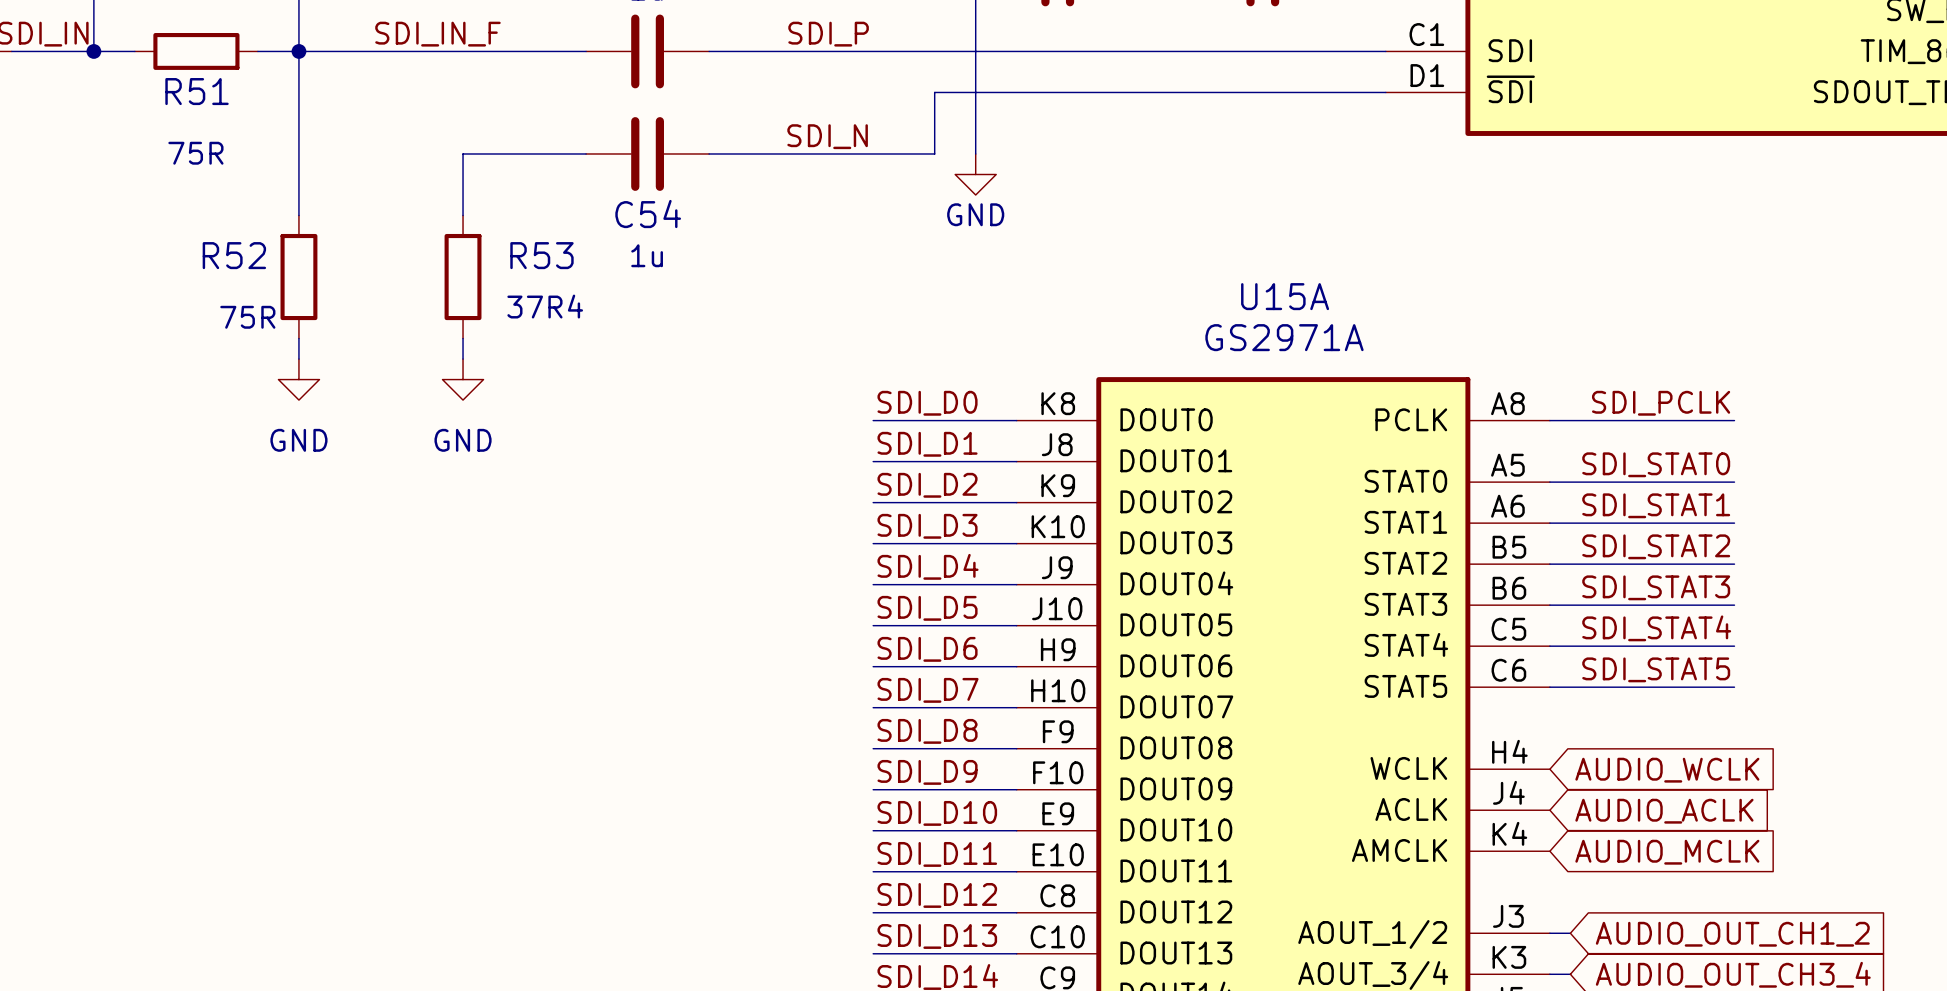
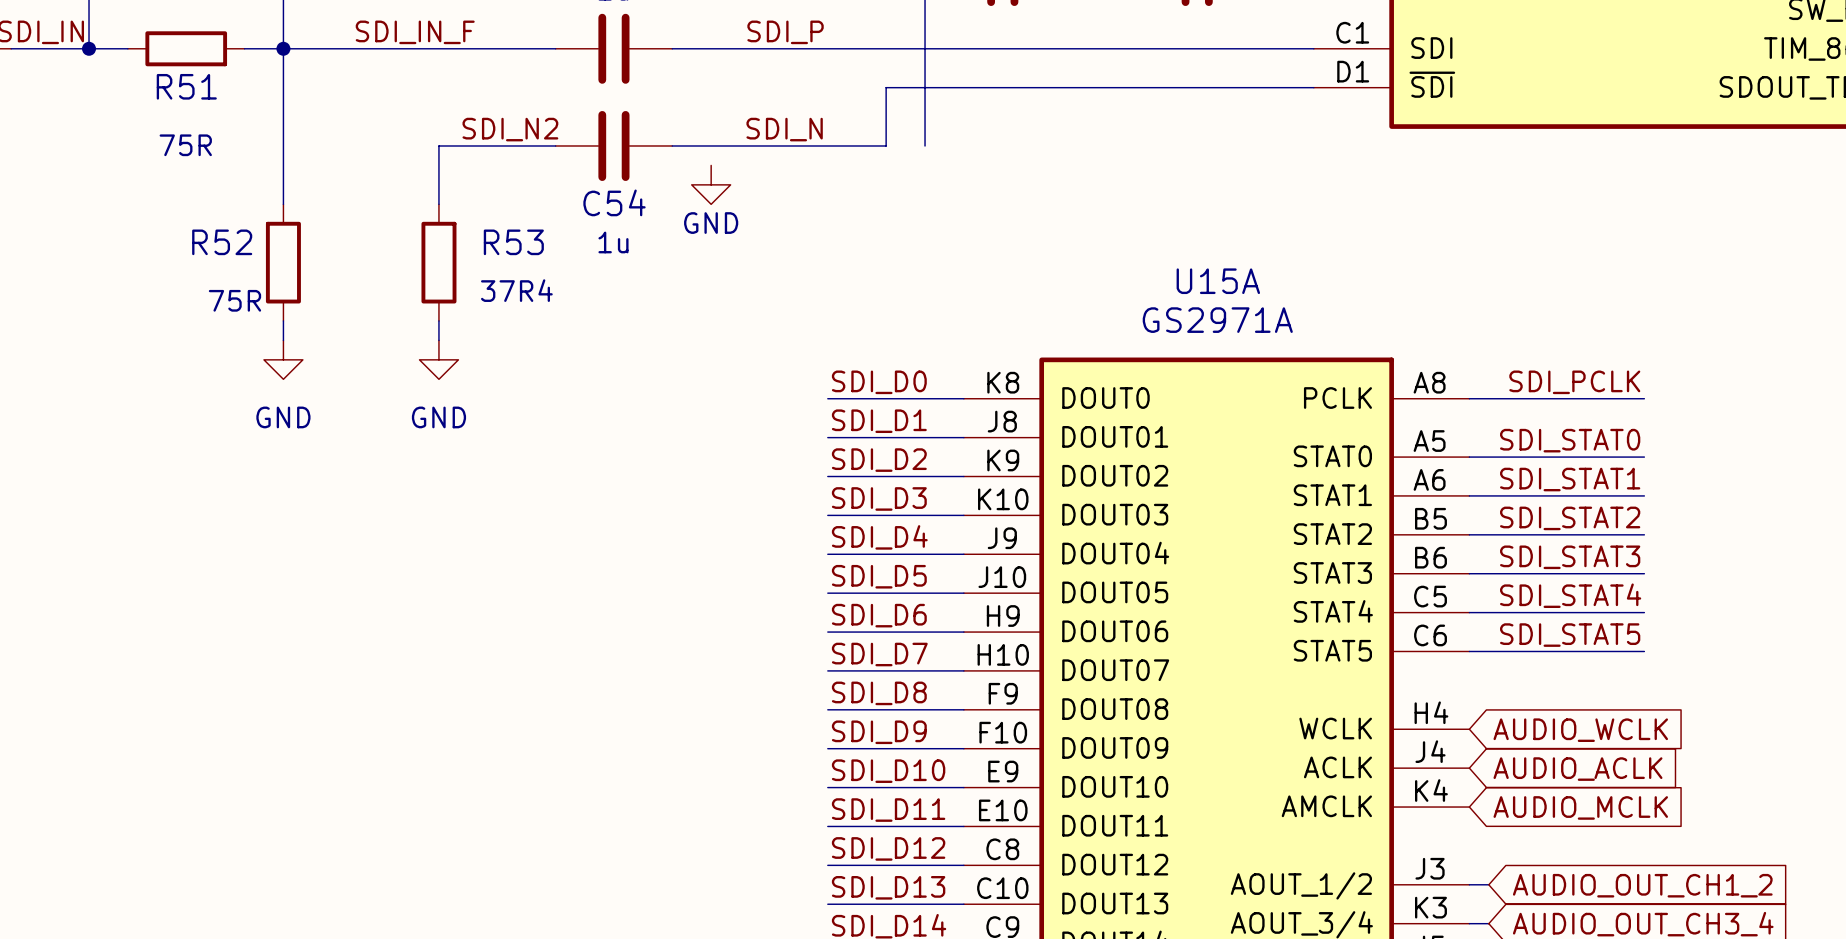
label: none -> SDI_N2 (510, 129)
power symbol position: GND (975, 174) -> GND (711, 184)

